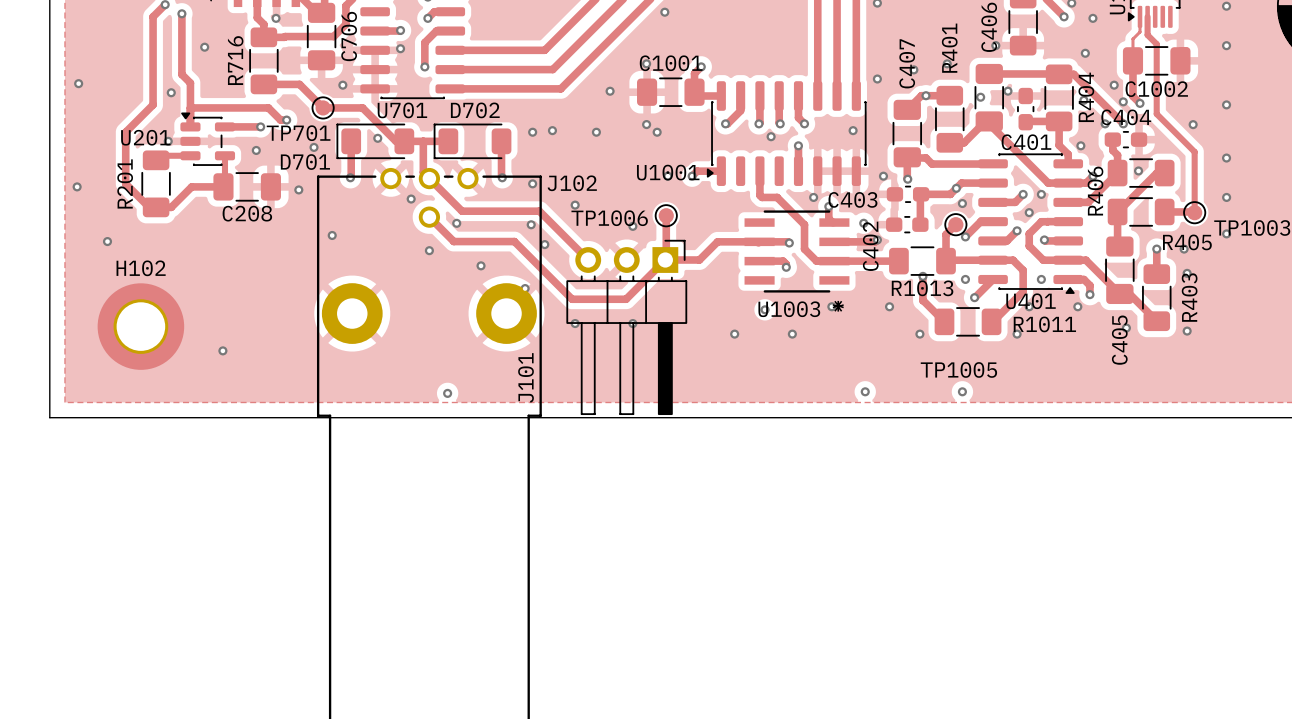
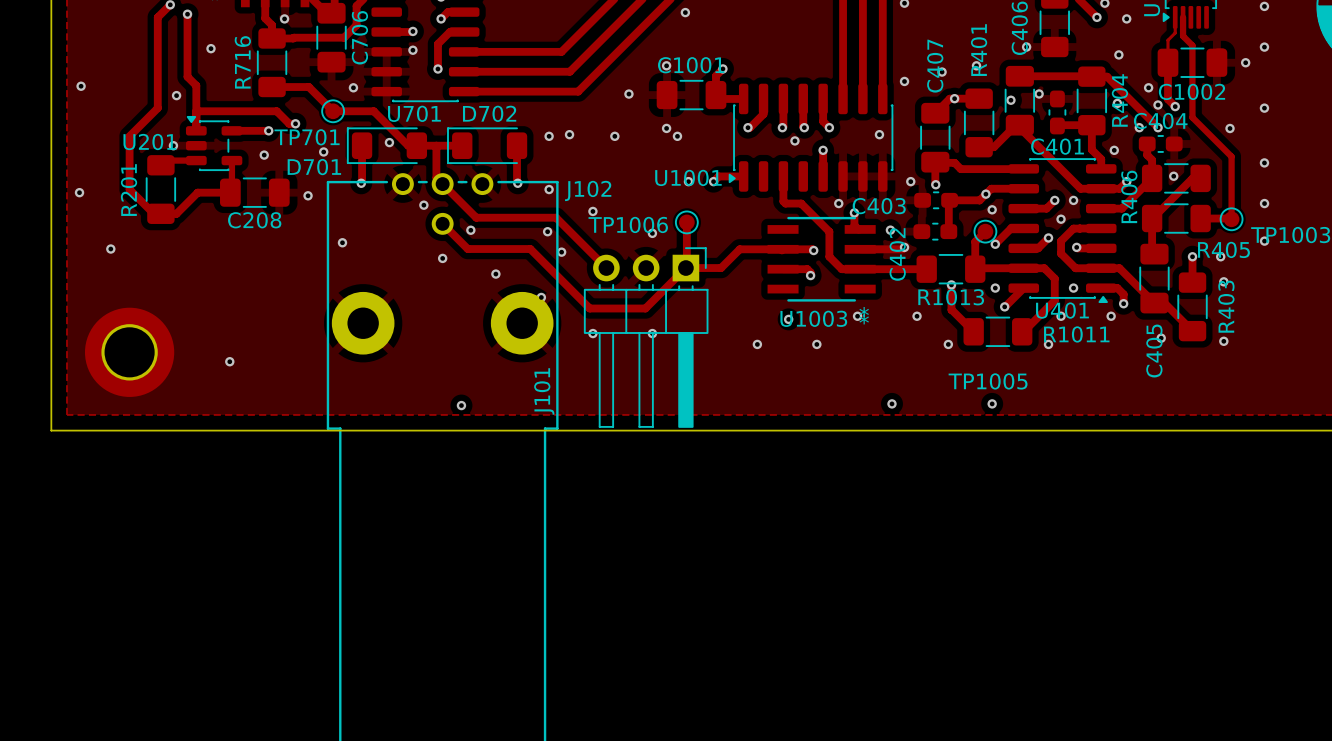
via: none -> (1245, 62)
H102: (140, 326) -> none
part: none -> (129, 352)

